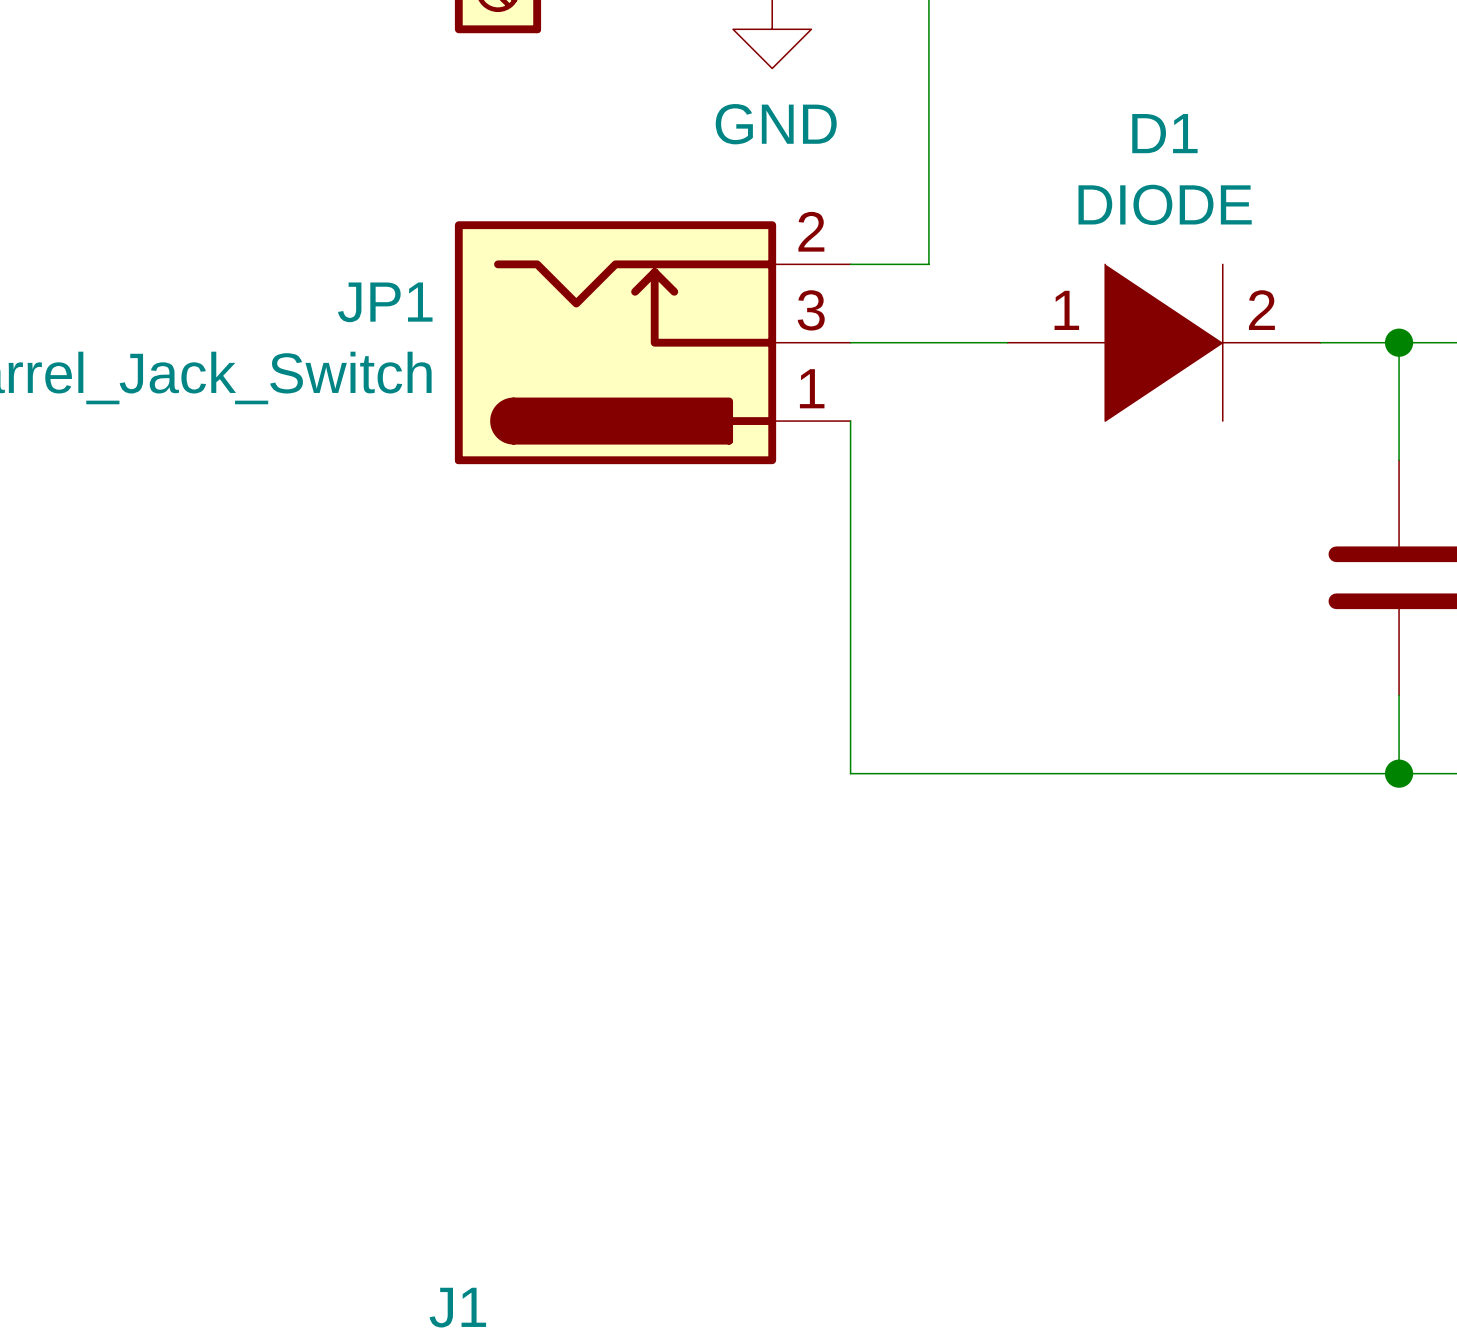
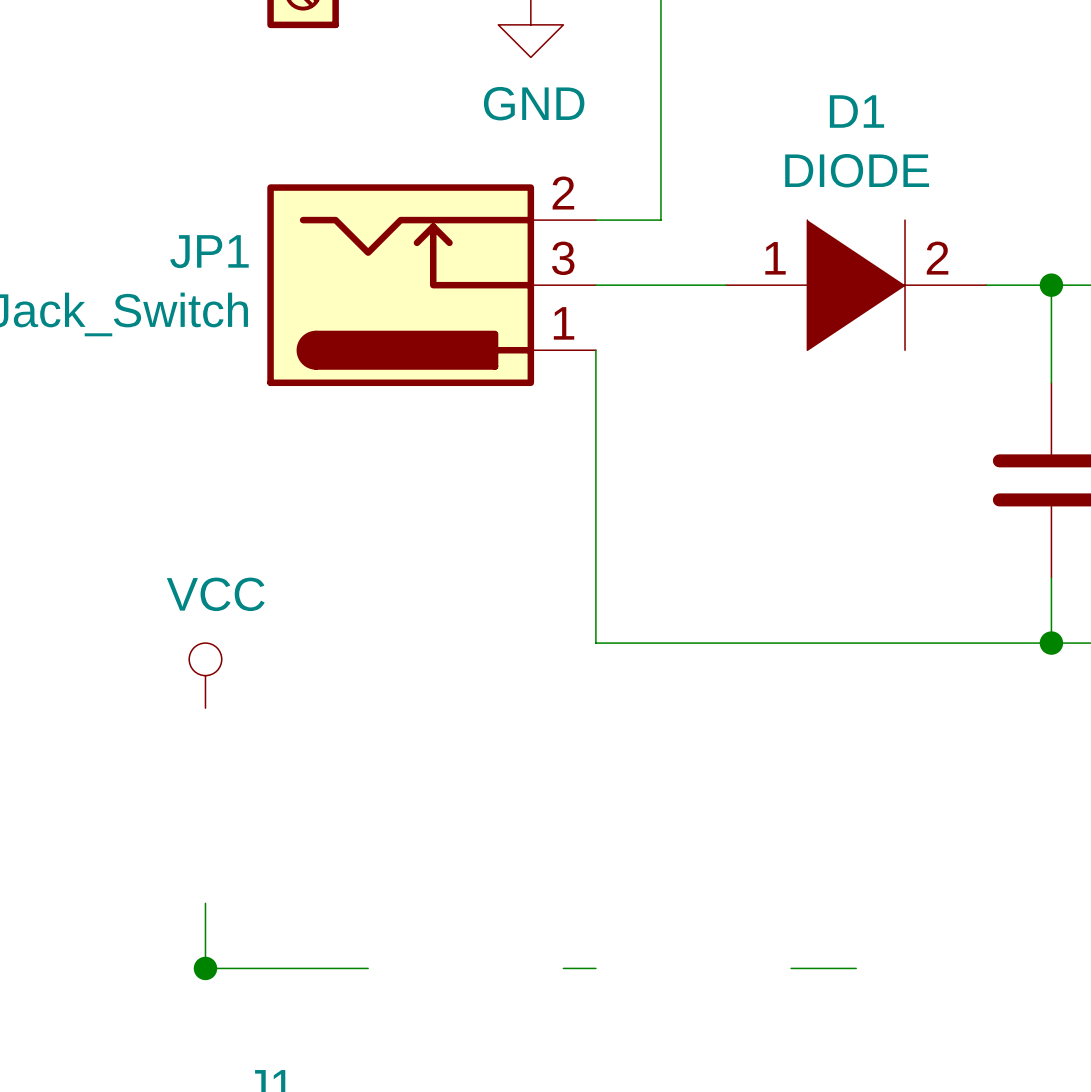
power symbol: none -> VCC (205, 675)
wire: none -> (205, 903) (205, 968) (368, 968)
junction: none -> (205, 968)
wire: none -> (563, 968) (595, 968)
wire: none -> (791, 968) (856, 968)

